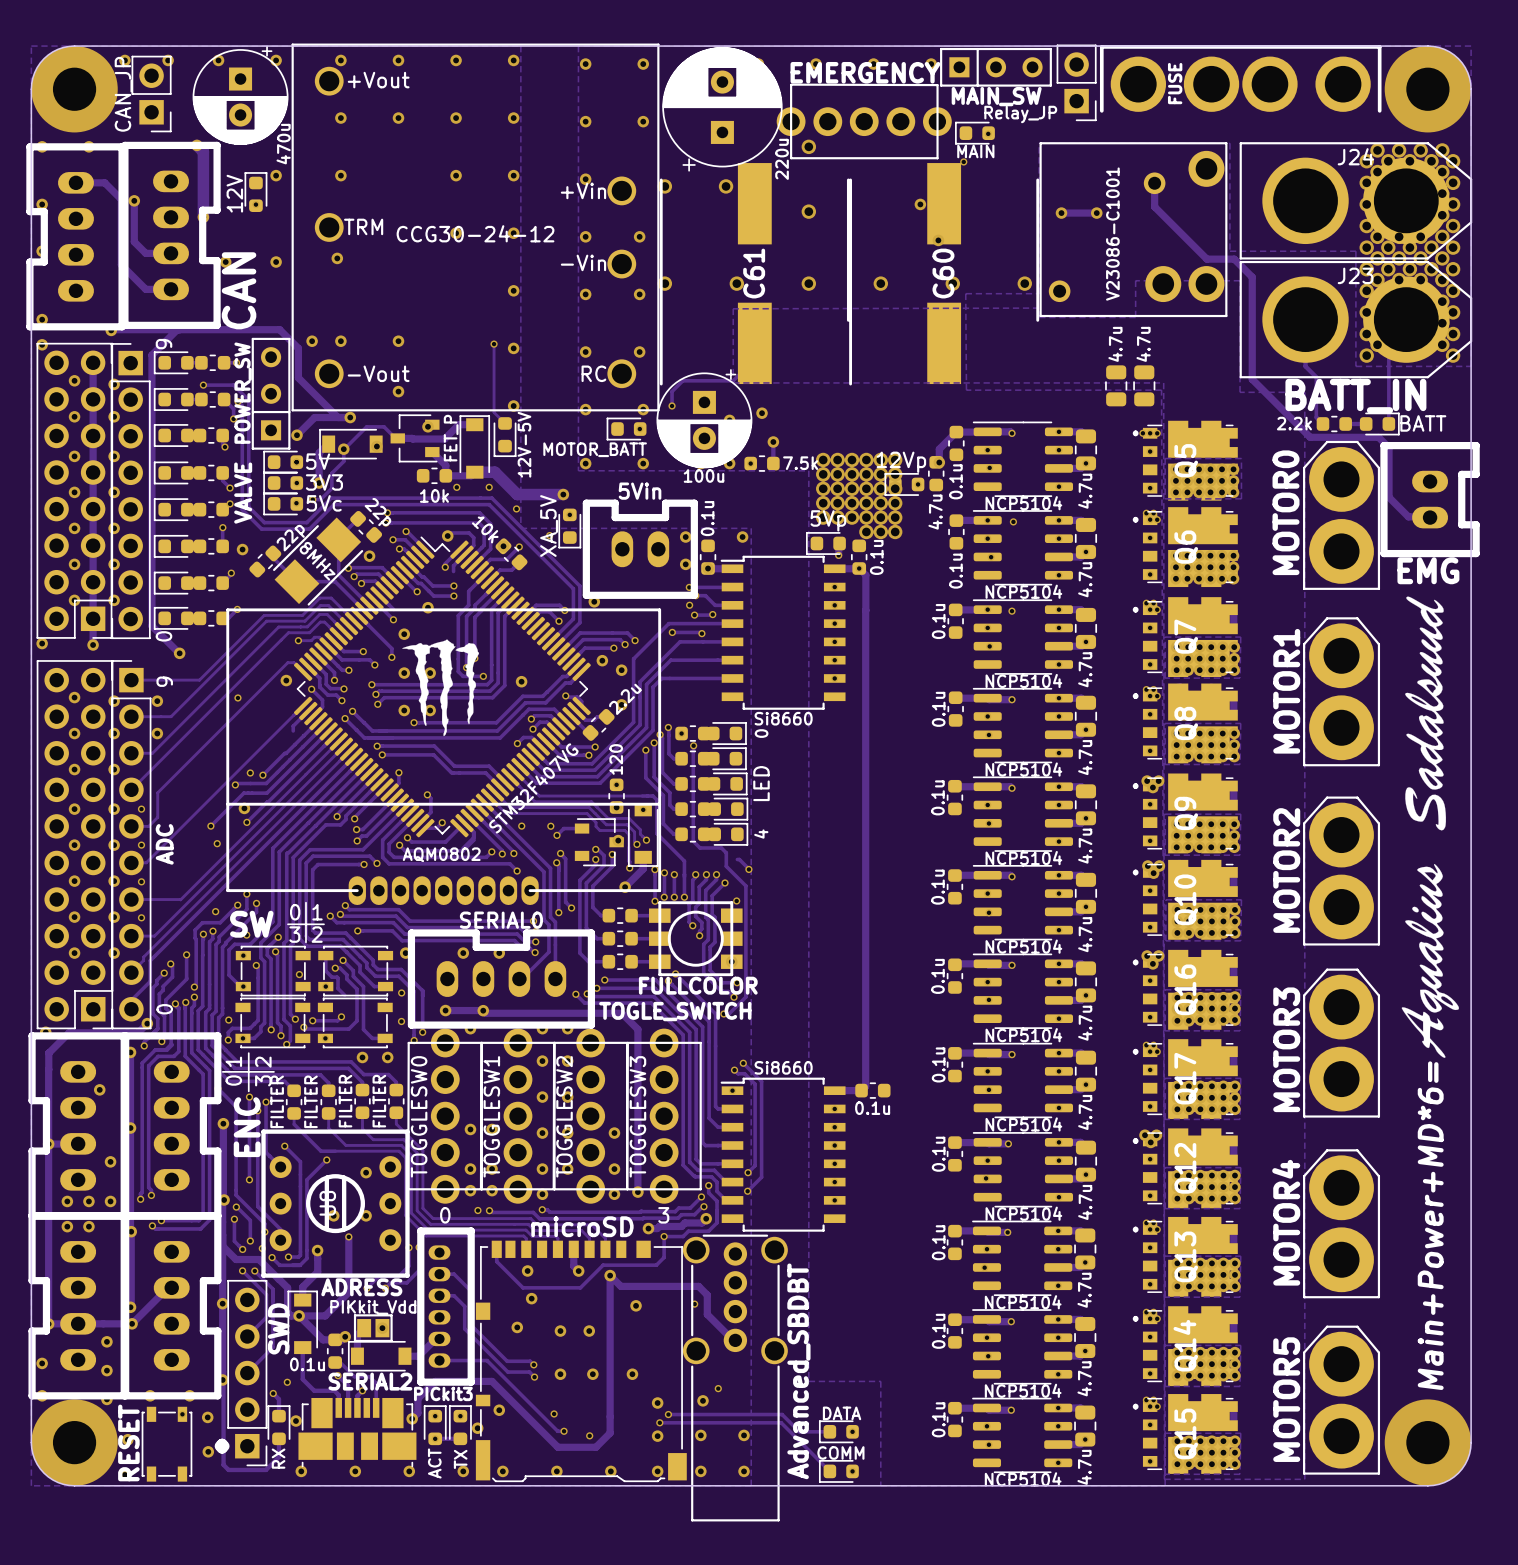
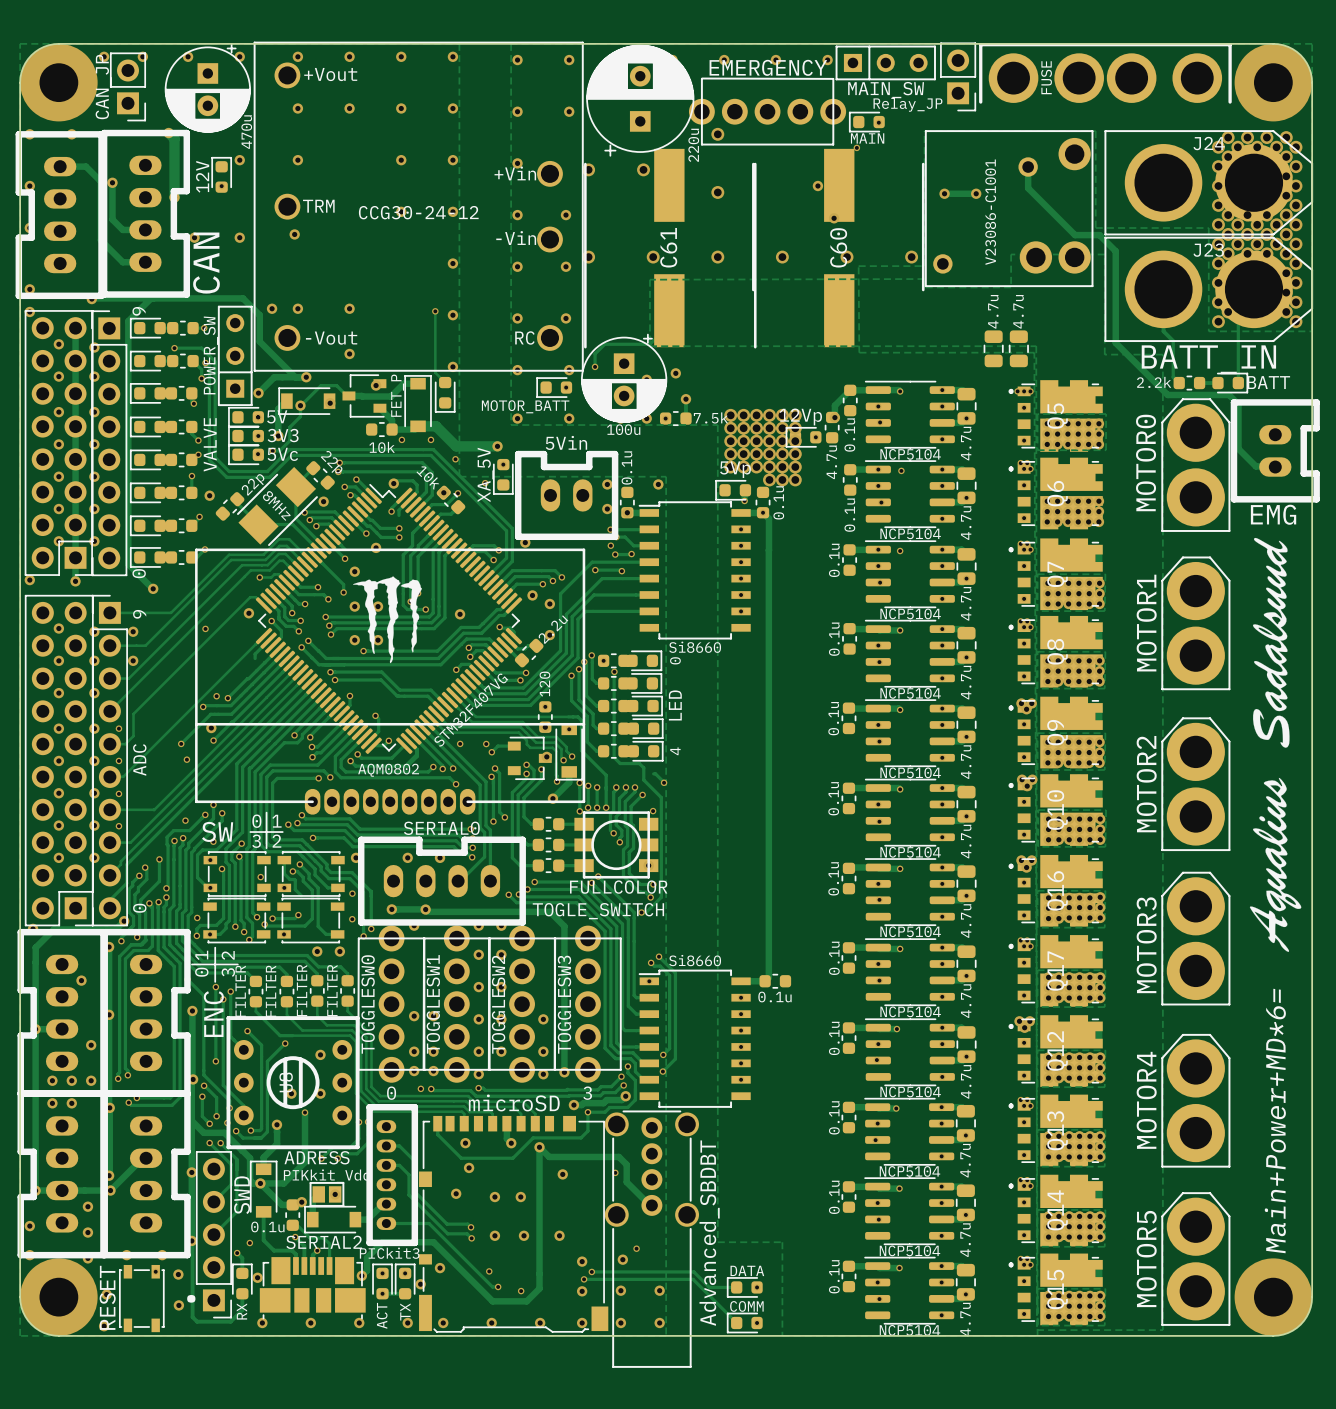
part value: 12V-5V (524, 444) -> none

